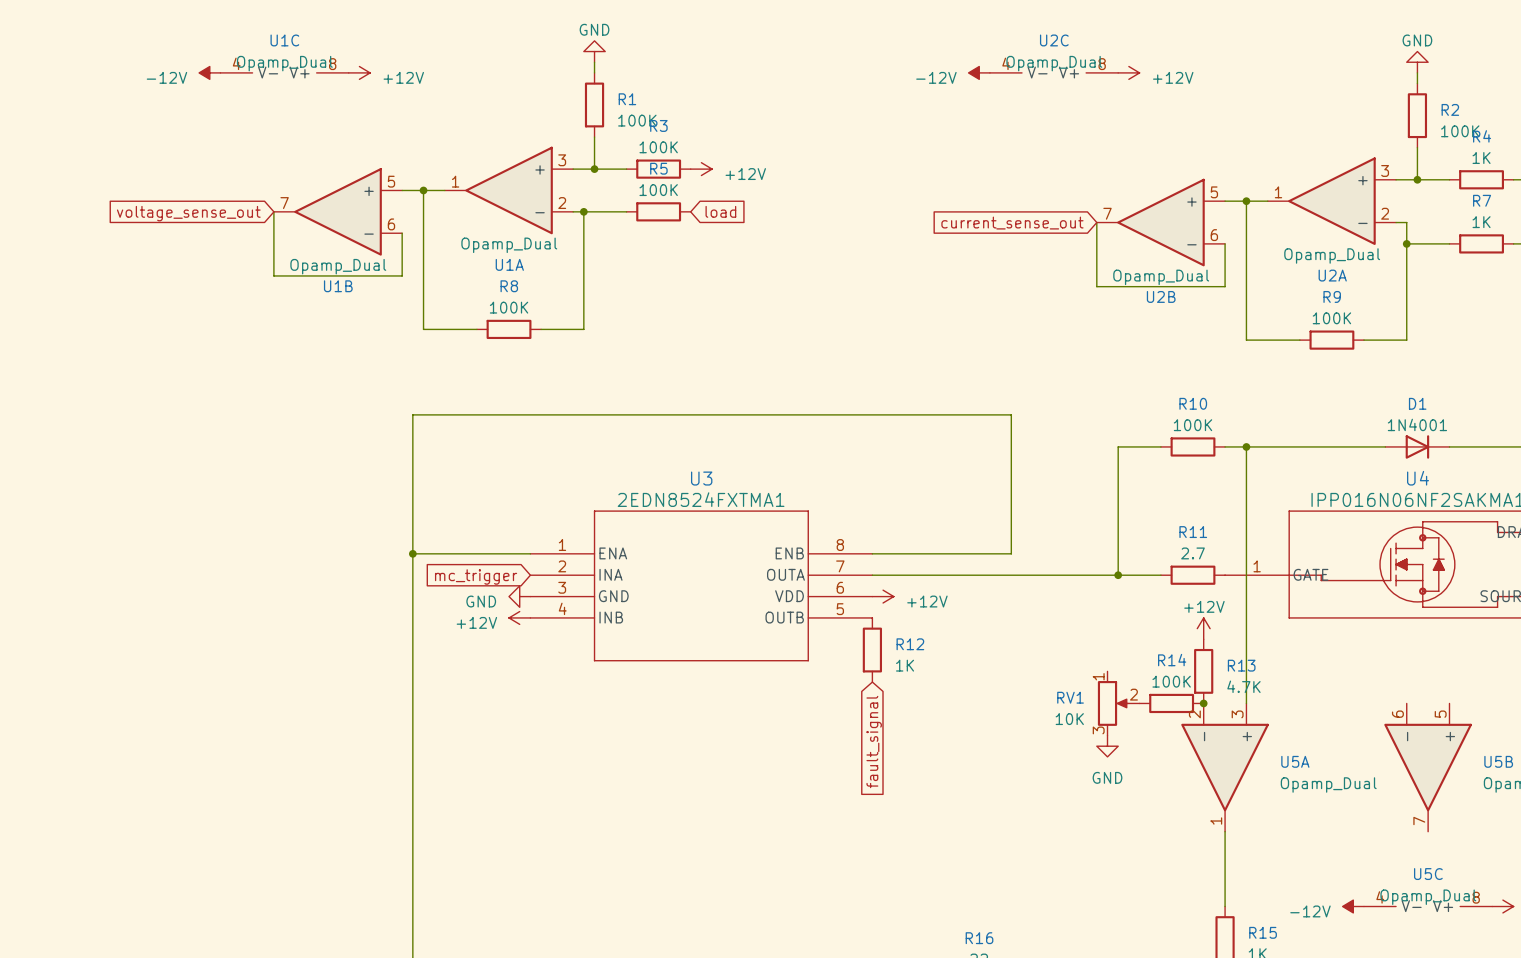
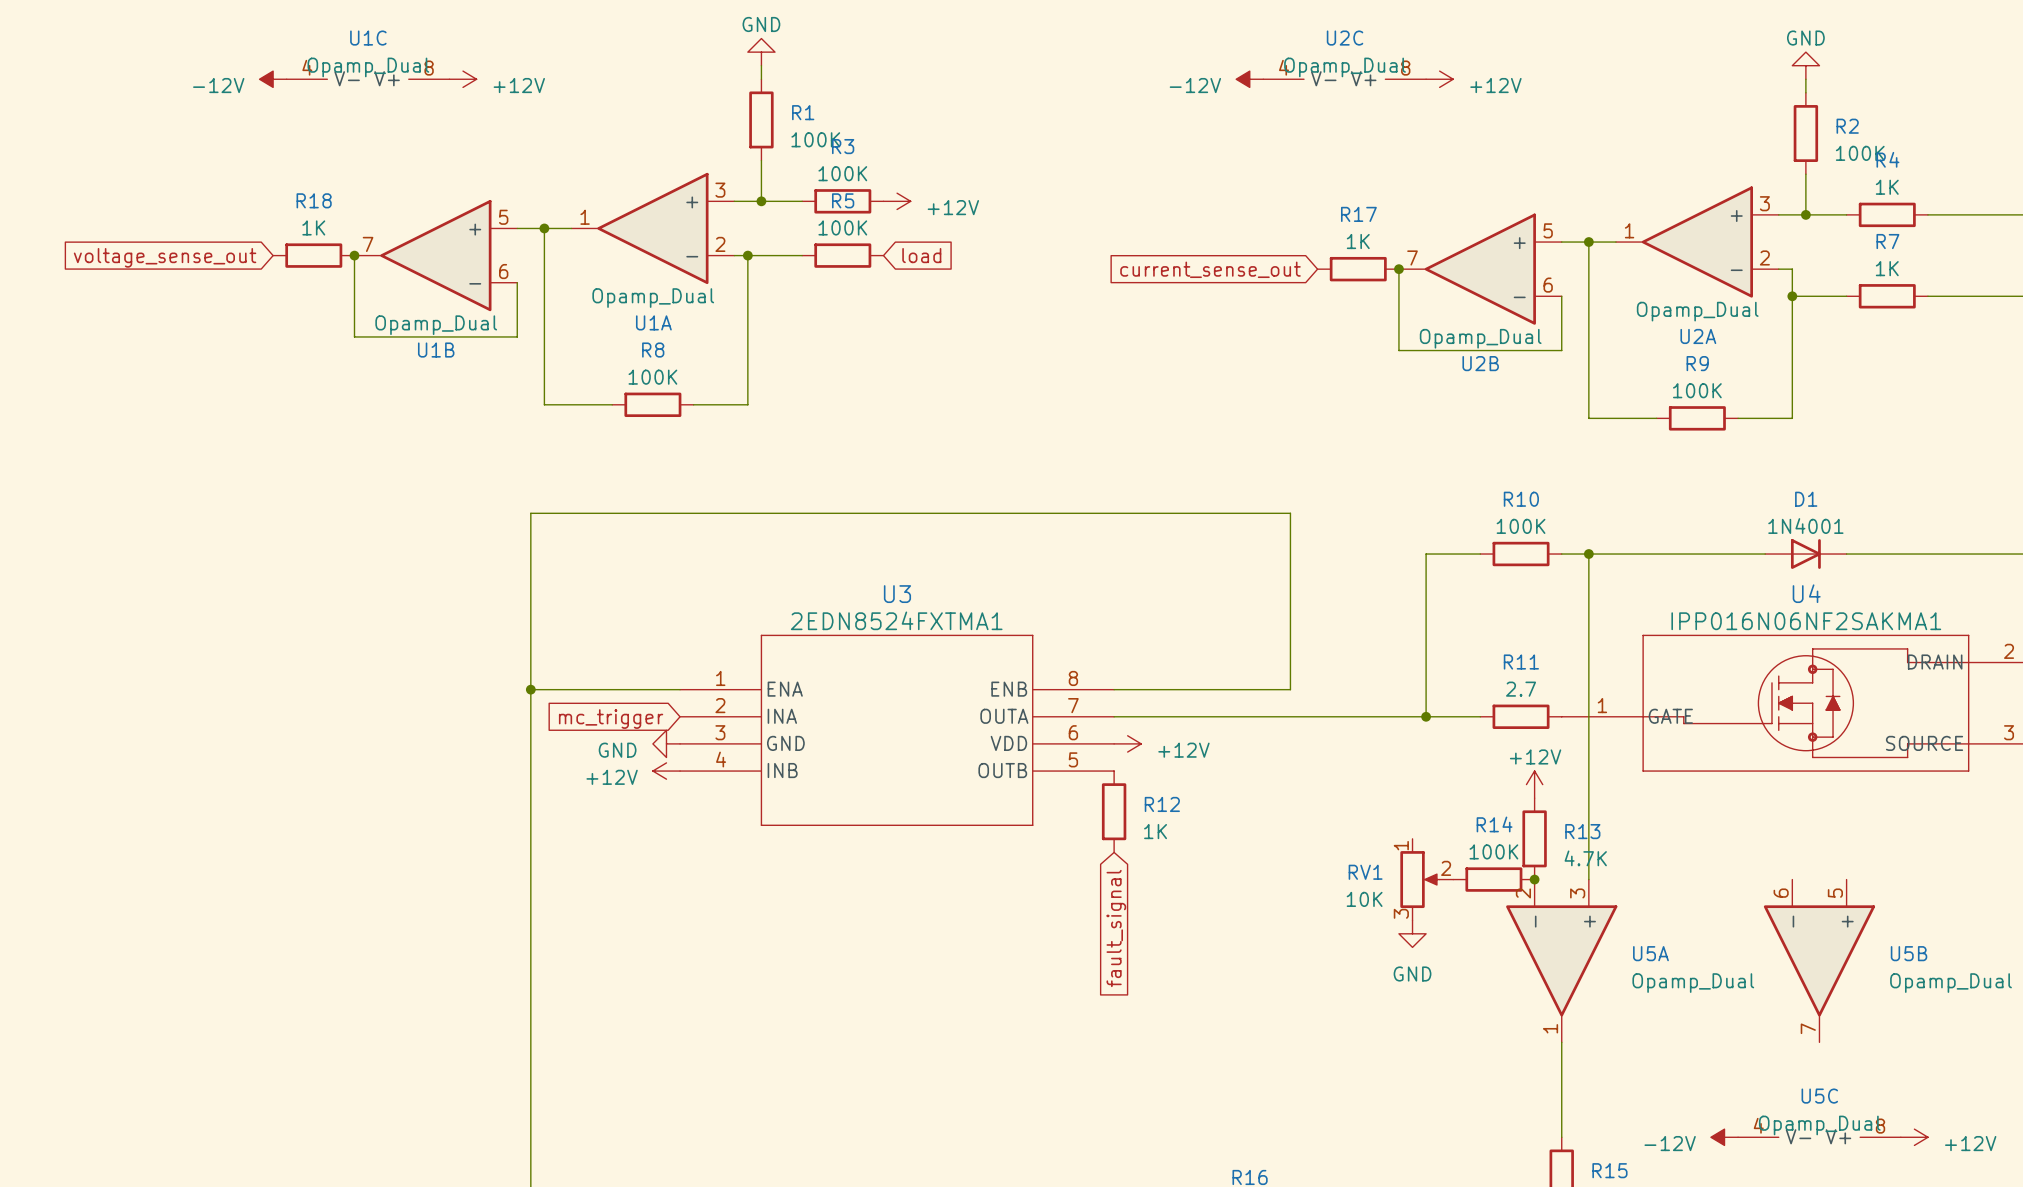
R18: none -> 1K (313, 255)
junction: none -> (354, 255)
global label position: voltage_sense_out (188, 213) -> voltage_sense_out (165, 257)
R17: none -> 1K (1358, 269)
junction: none -> (1398, 269)
global label position: current_sense_out (1012, 223) -> current_sense_out (1210, 269)

